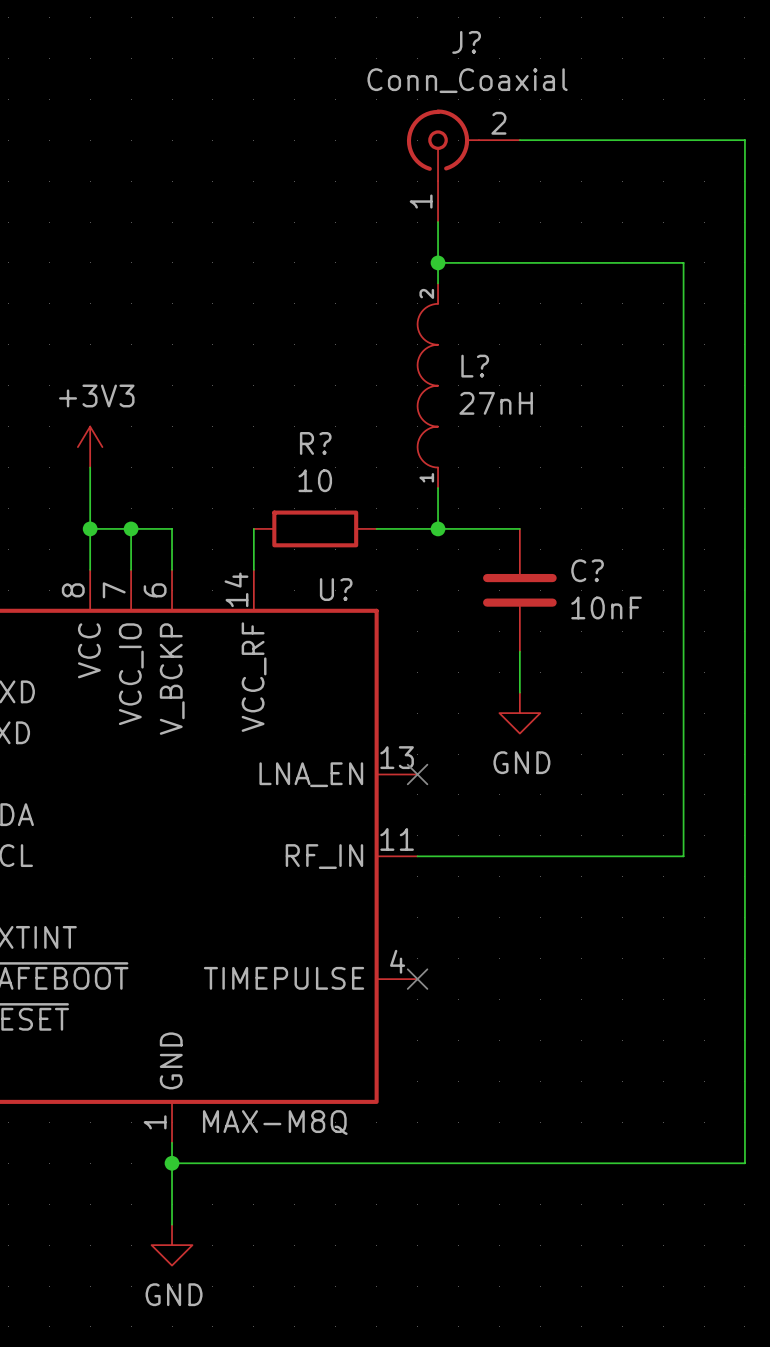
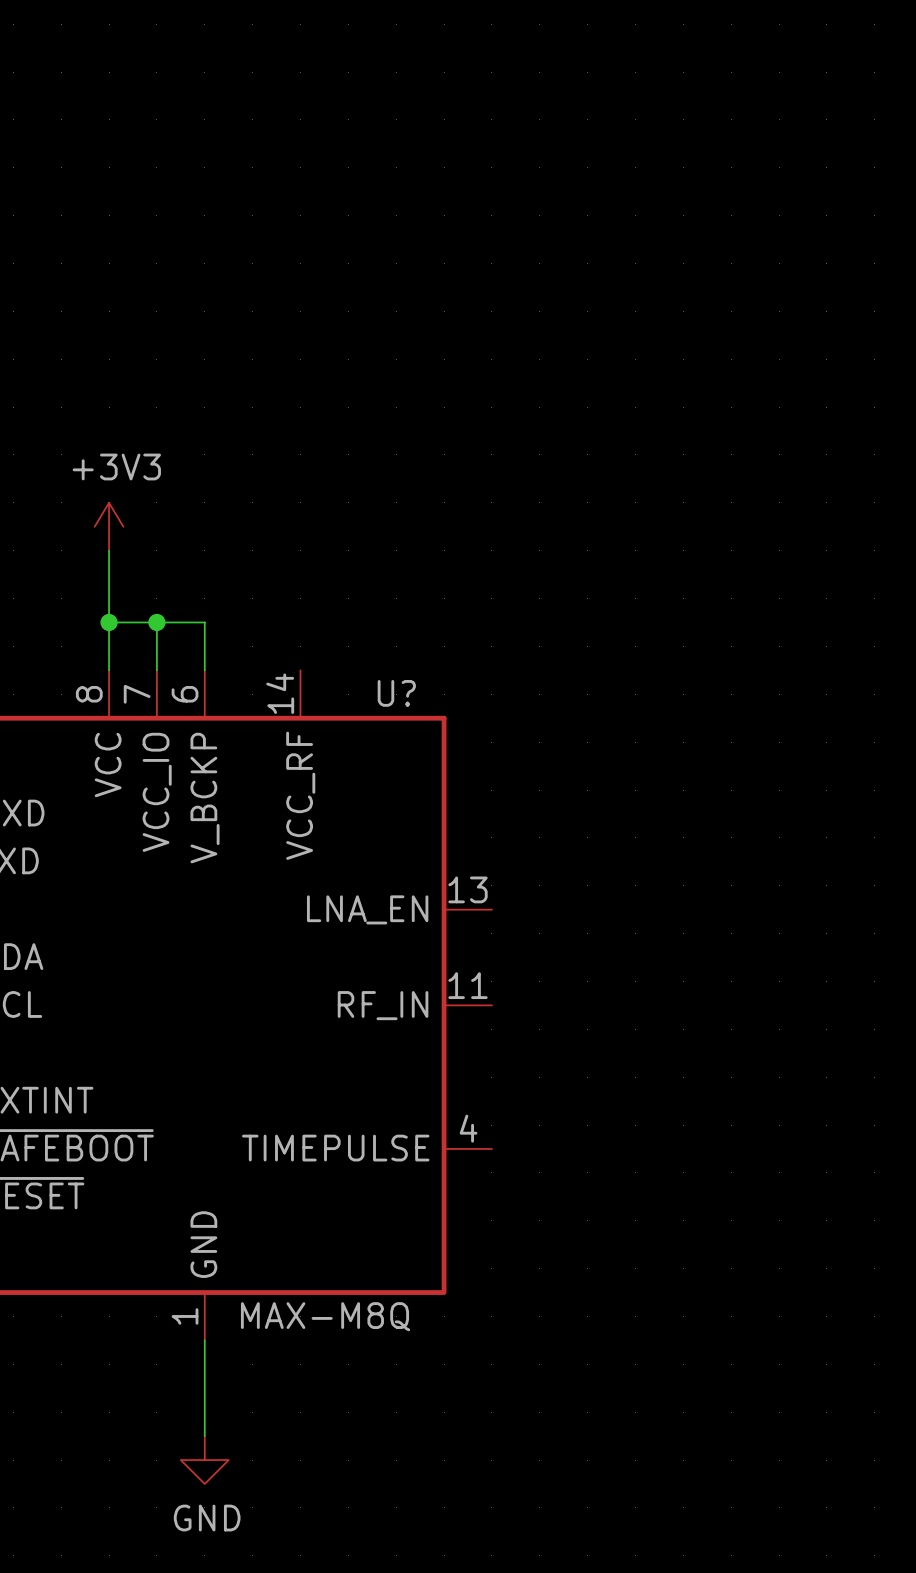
wire: (519, 140) (744, 140) (744, 1163) (172, 1163) -> none
J?: Conn_Coaxial (463, 165) -> none
wire: (438, 222) (438, 283) -> none
wire: (438, 262) (683, 262) (683, 856) (417, 856) -> none
junction: (438, 262) -> none
L?: 27nH (427, 385) -> none
wire: (438, 488) (438, 528) -> none
wire: (253, 528) (253, 569) -> none
R?: 10 (315, 528) -> none
wire: (376, 528) (519, 528) -> none
junction: (438, 528) -> none
C?: 10nF (519, 590) -> none
wire: (519, 651) (519, 692) -> none
power symbol: GND (519, 713) -> none
no-connect mark: (417, 774) -> none
no-connect mark: (417, 979) -> none
junction: (172, 1163) -> none

